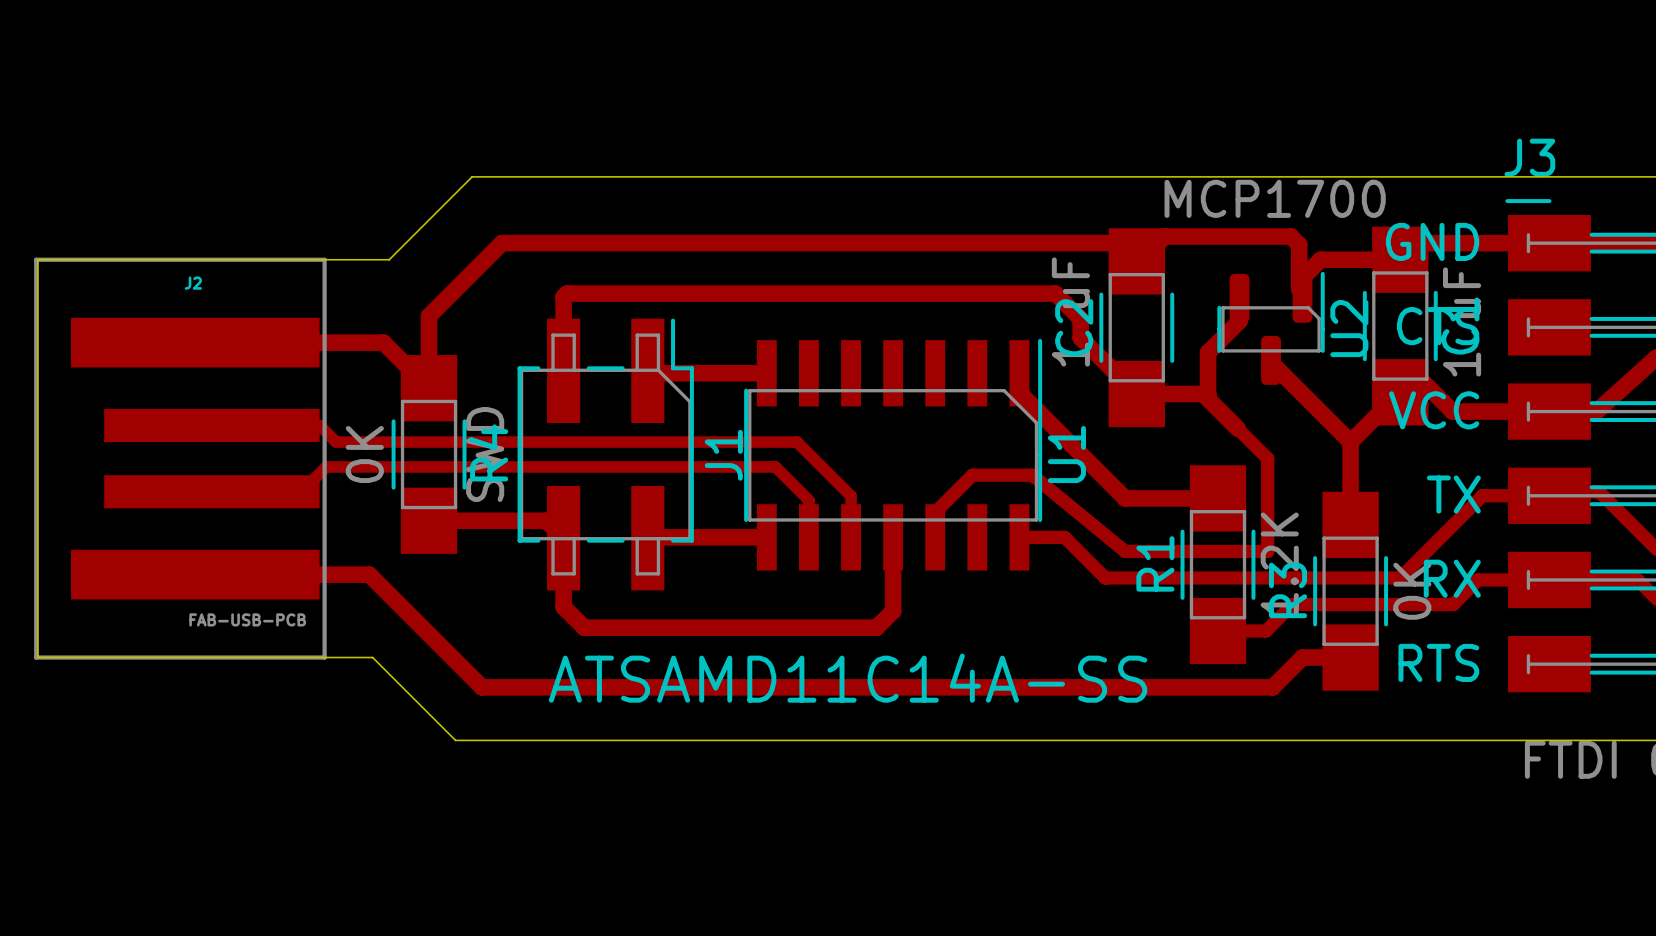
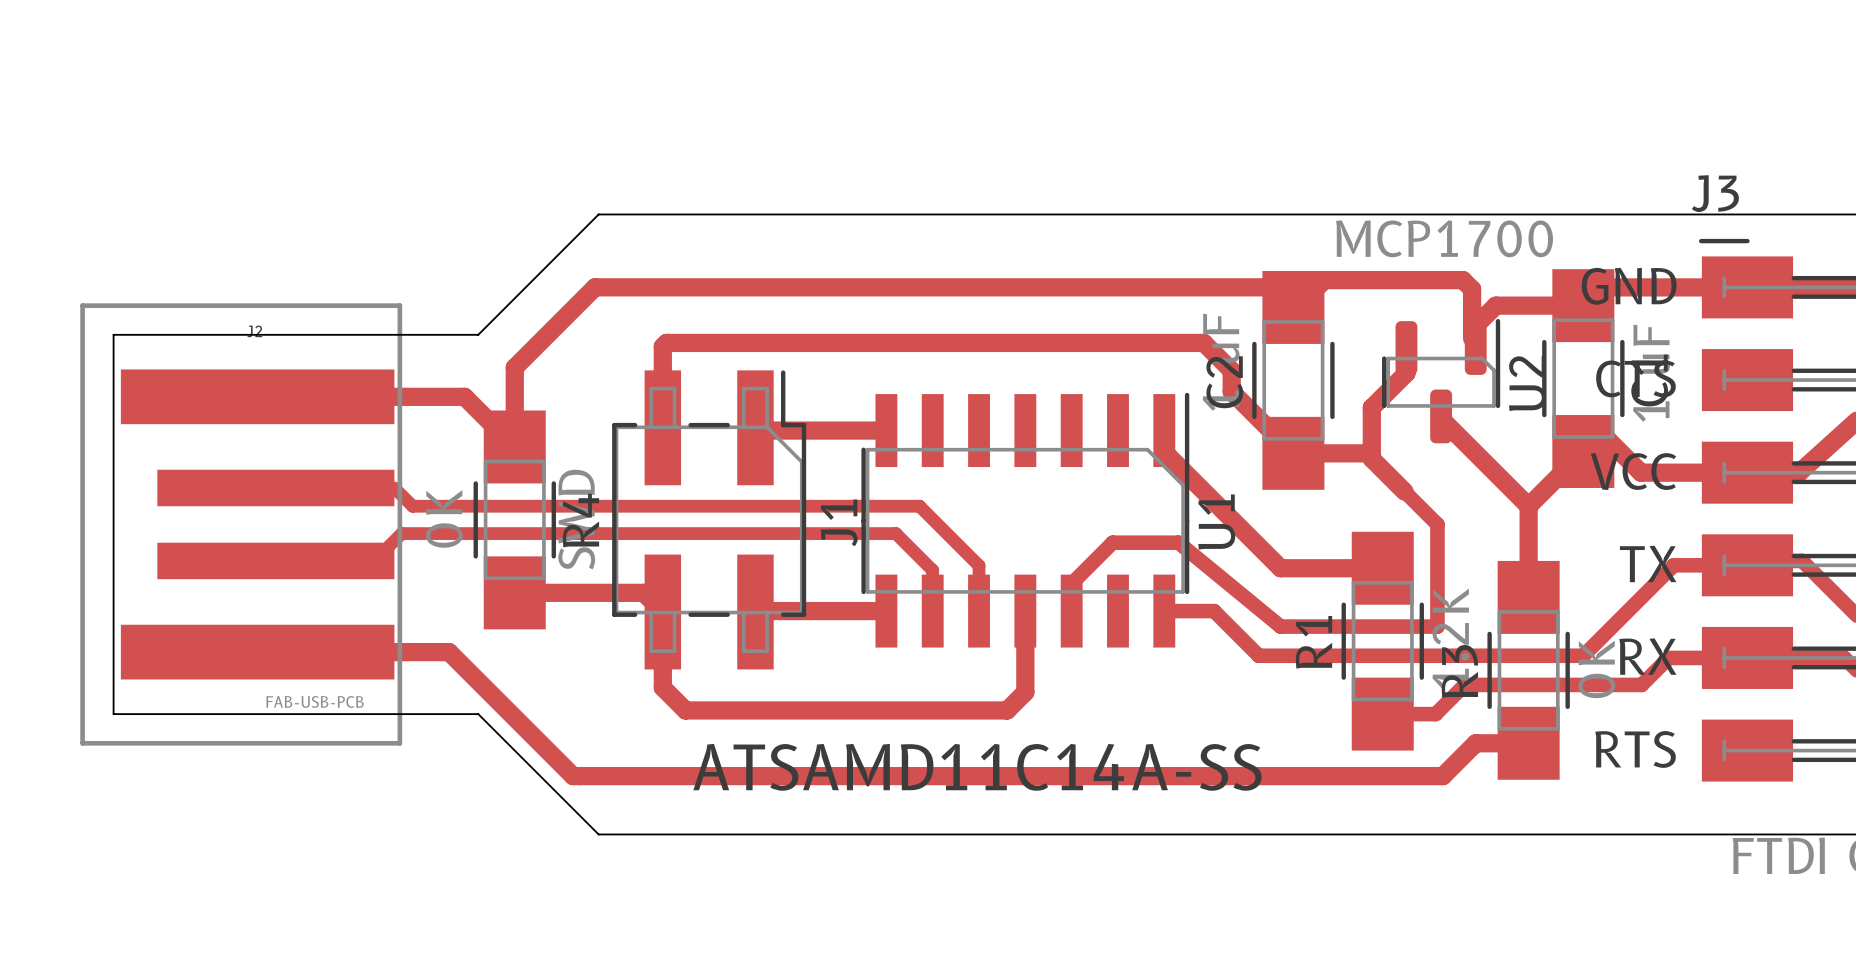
board edge: (505, 176) (472, 176) (389, 259) (37, 259) (37, 657) (372, 657) (455, 740) (505, 740) -> (598, 214) (478, 334) (113, 334) (113, 714) (478, 714) (598, 834)

